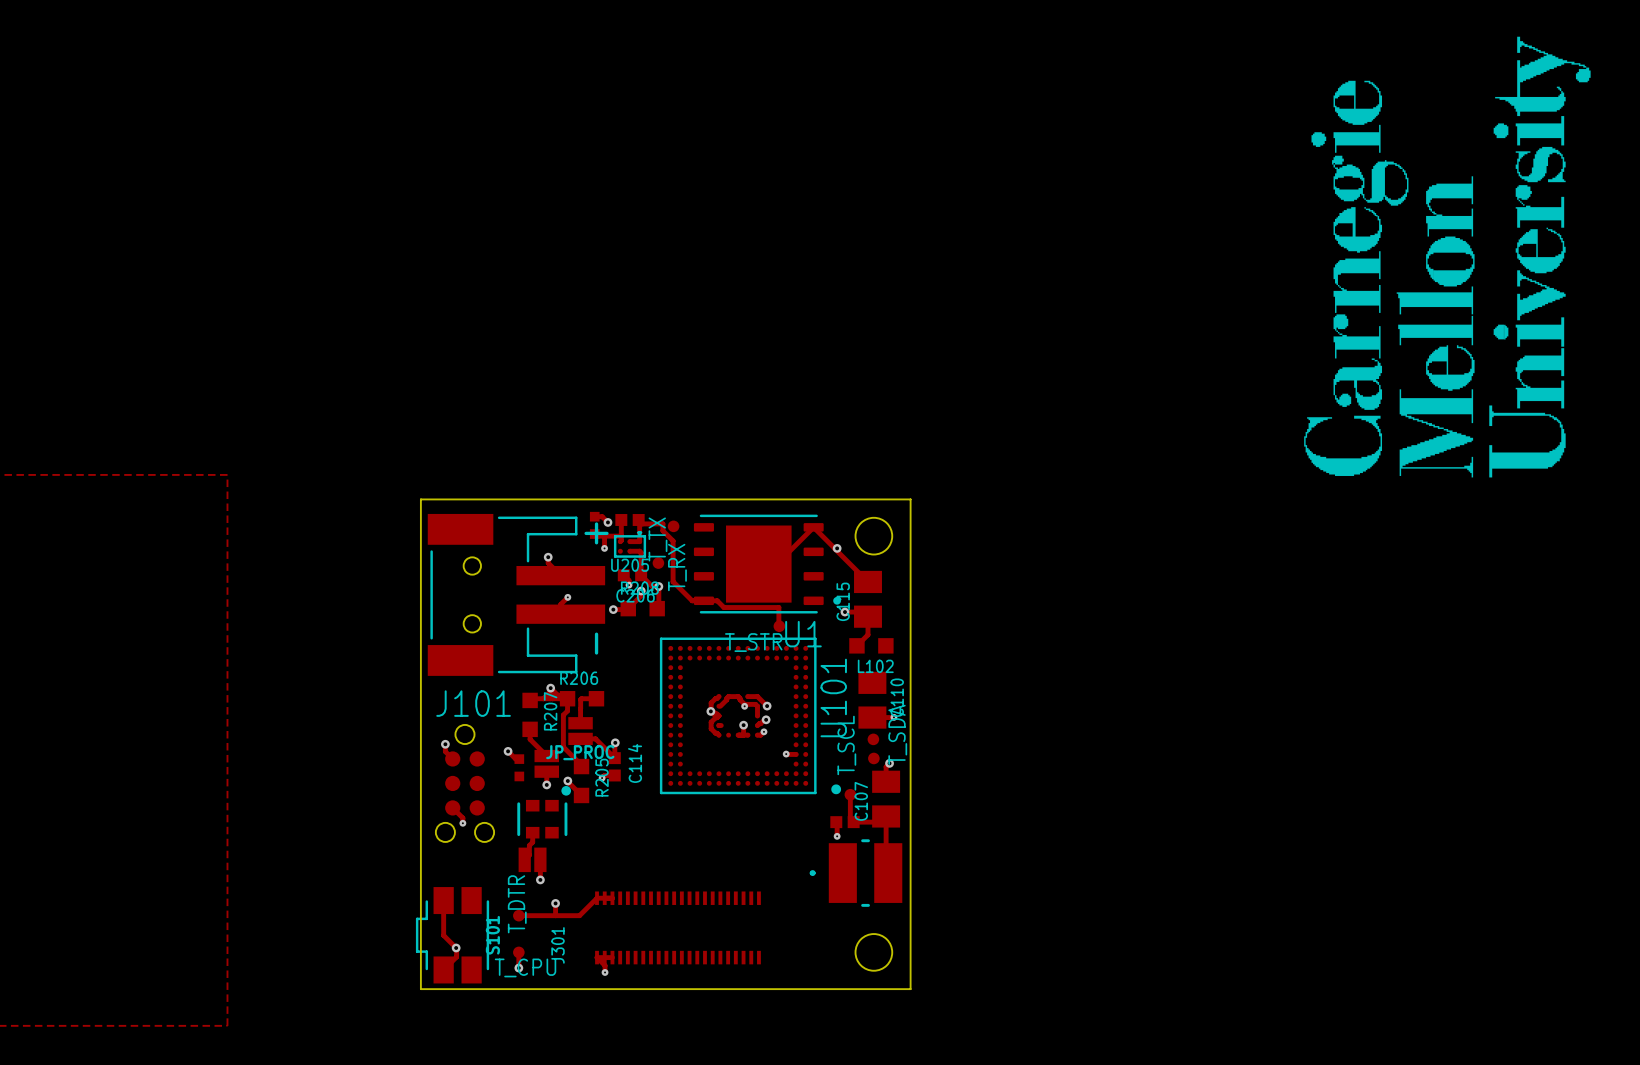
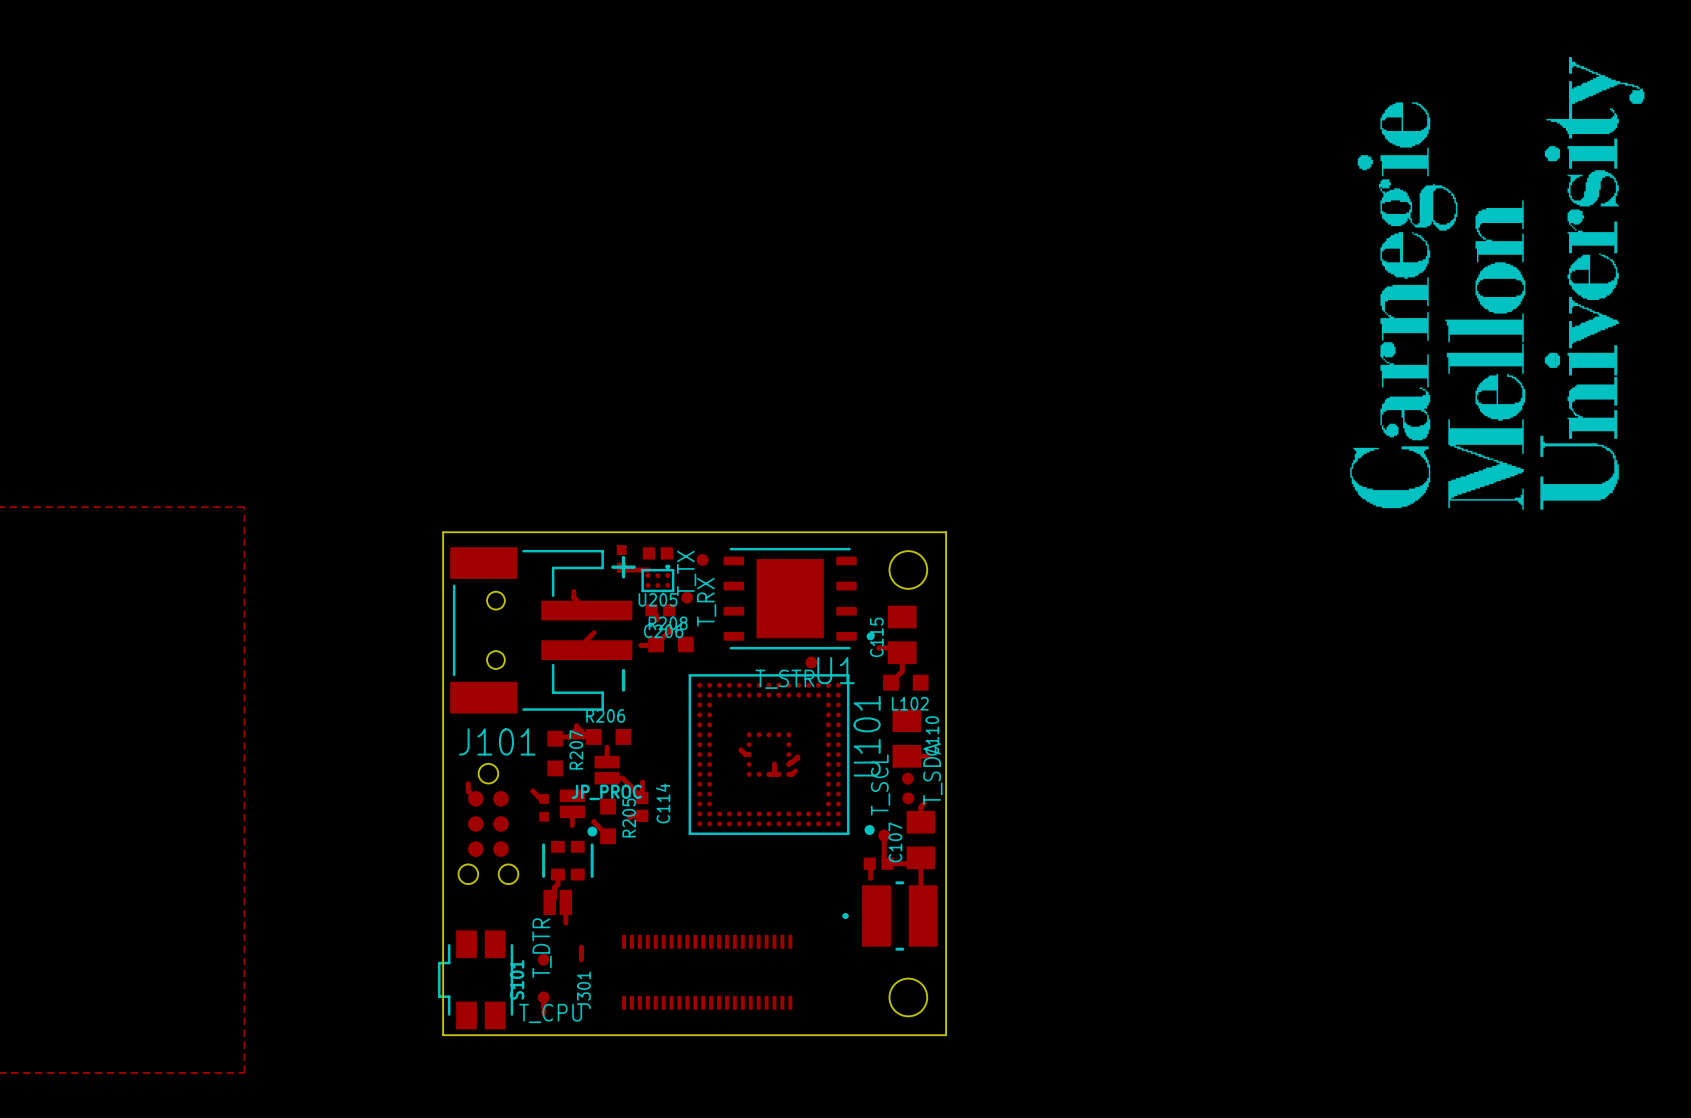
track: (594, 516) (602, 516) (607, 522) -> none
track: (621, 519) (620, 541) -> none
track: (638, 519) (642, 523) (662, 523) (662, 530) (673, 540) (673, 581) (692, 600) (717, 600) (723, 607) (778, 607) (779, 626) -> none
track: (639, 520) (639, 541) (630, 541) -> none
via: (607, 522) -> none
track: (604, 536) (604, 548) -> none
via: (604, 548) -> none
track: (834, 548) (868, 581) -> none
track: (837, 548) (834, 548) (813, 527) (776, 564) (758, 564) -> none
via: (837, 548) -> none
track: (630, 551) (641, 552) (641, 575) (652, 586) (658, 586) (658, 606) (657, 608) -> none
via: (548, 557) -> none
via: (629, 585) -> none
via: (658, 586) -> none
via: (641, 591) -> none
via: (567, 597) -> none
via: (613, 609) -> none
via: (844, 612) -> none
via: (550, 688) -> none
track: (552, 695) (564, 695) (567, 698) (567, 710) (563, 715) (563, 747) (581, 766) -> none
track: (718, 696) (711, 703) (711, 709) (718, 715) (711, 722) (711, 728) (718, 735) -> none
track: (747, 696) (757, 696) (766, 706) -> none
track: (596, 698) (581, 698) (580, 708) -> none
track: (744, 704) (738, 696) (728, 696) (720, 706) -> none
track: (744, 704) (755, 704) (757, 706) (757, 715) -> none
via: (744, 706) -> none
via: (767, 706) -> none
via: (710, 711) -> none
via: (893, 717) -> none
via: (766, 719) -> none
track: (718, 725) (721, 725) -> none
via: (743, 725) -> none
track: (530, 729) (530, 739) (546, 756) -> none
via: (763, 731) -> none
via: (615, 742) -> none
via: (445, 744) -> none
via: (508, 751) -> none
track: (786, 754) (796, 754) -> none
via: (786, 754) -> none
via: (889, 763) -> none
via: (602, 778) -> none
via: (567, 781) -> none
via: (546, 784) -> none
track: (452, 807) (462, 818) (462, 823) -> none
via: (462, 823) -> none
via: (837, 836) -> none
via: (540, 879) -> none
track: (612, 898) (597, 898) (579, 915) (518, 915) -> none
track: (443, 900) (443, 935) (456, 948) (456, 957) (443, 969) -> none
via: (555, 903) -> none
via: (456, 947) -> none
track: (612, 957) (597, 957) (605, 965) (605, 972) -> none
via: (518, 968) -> none
via: (605, 972) -> none

